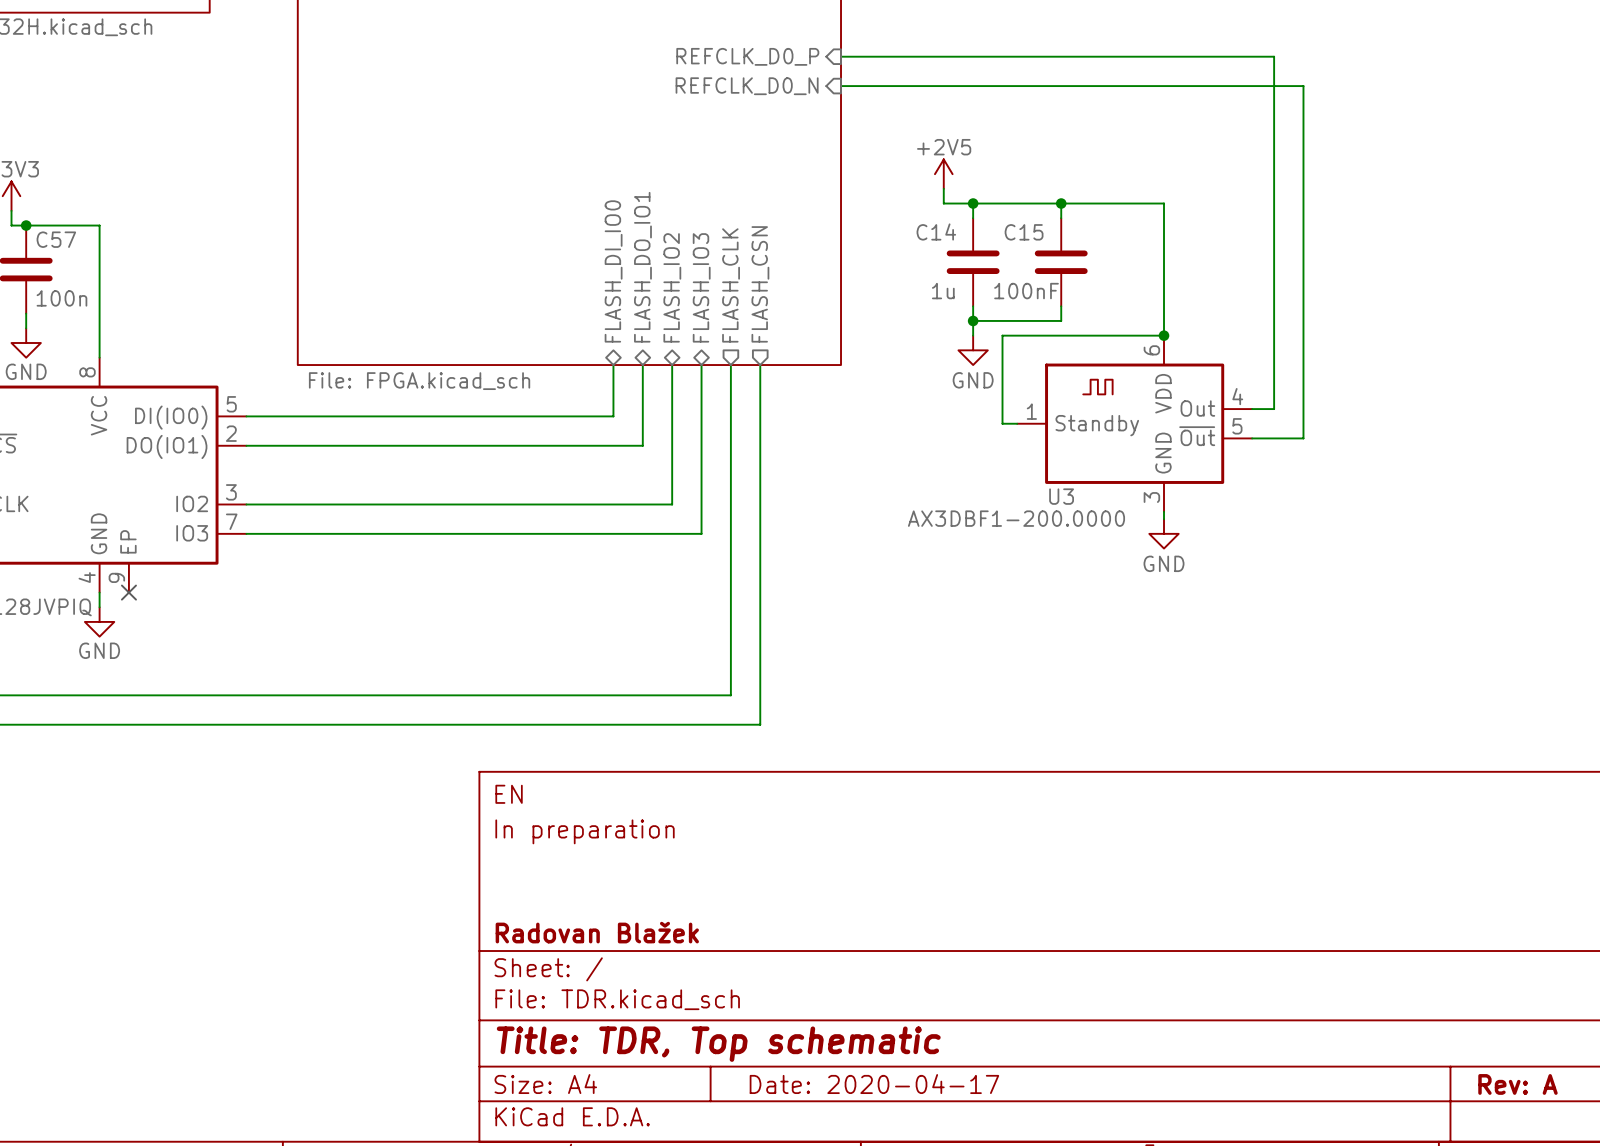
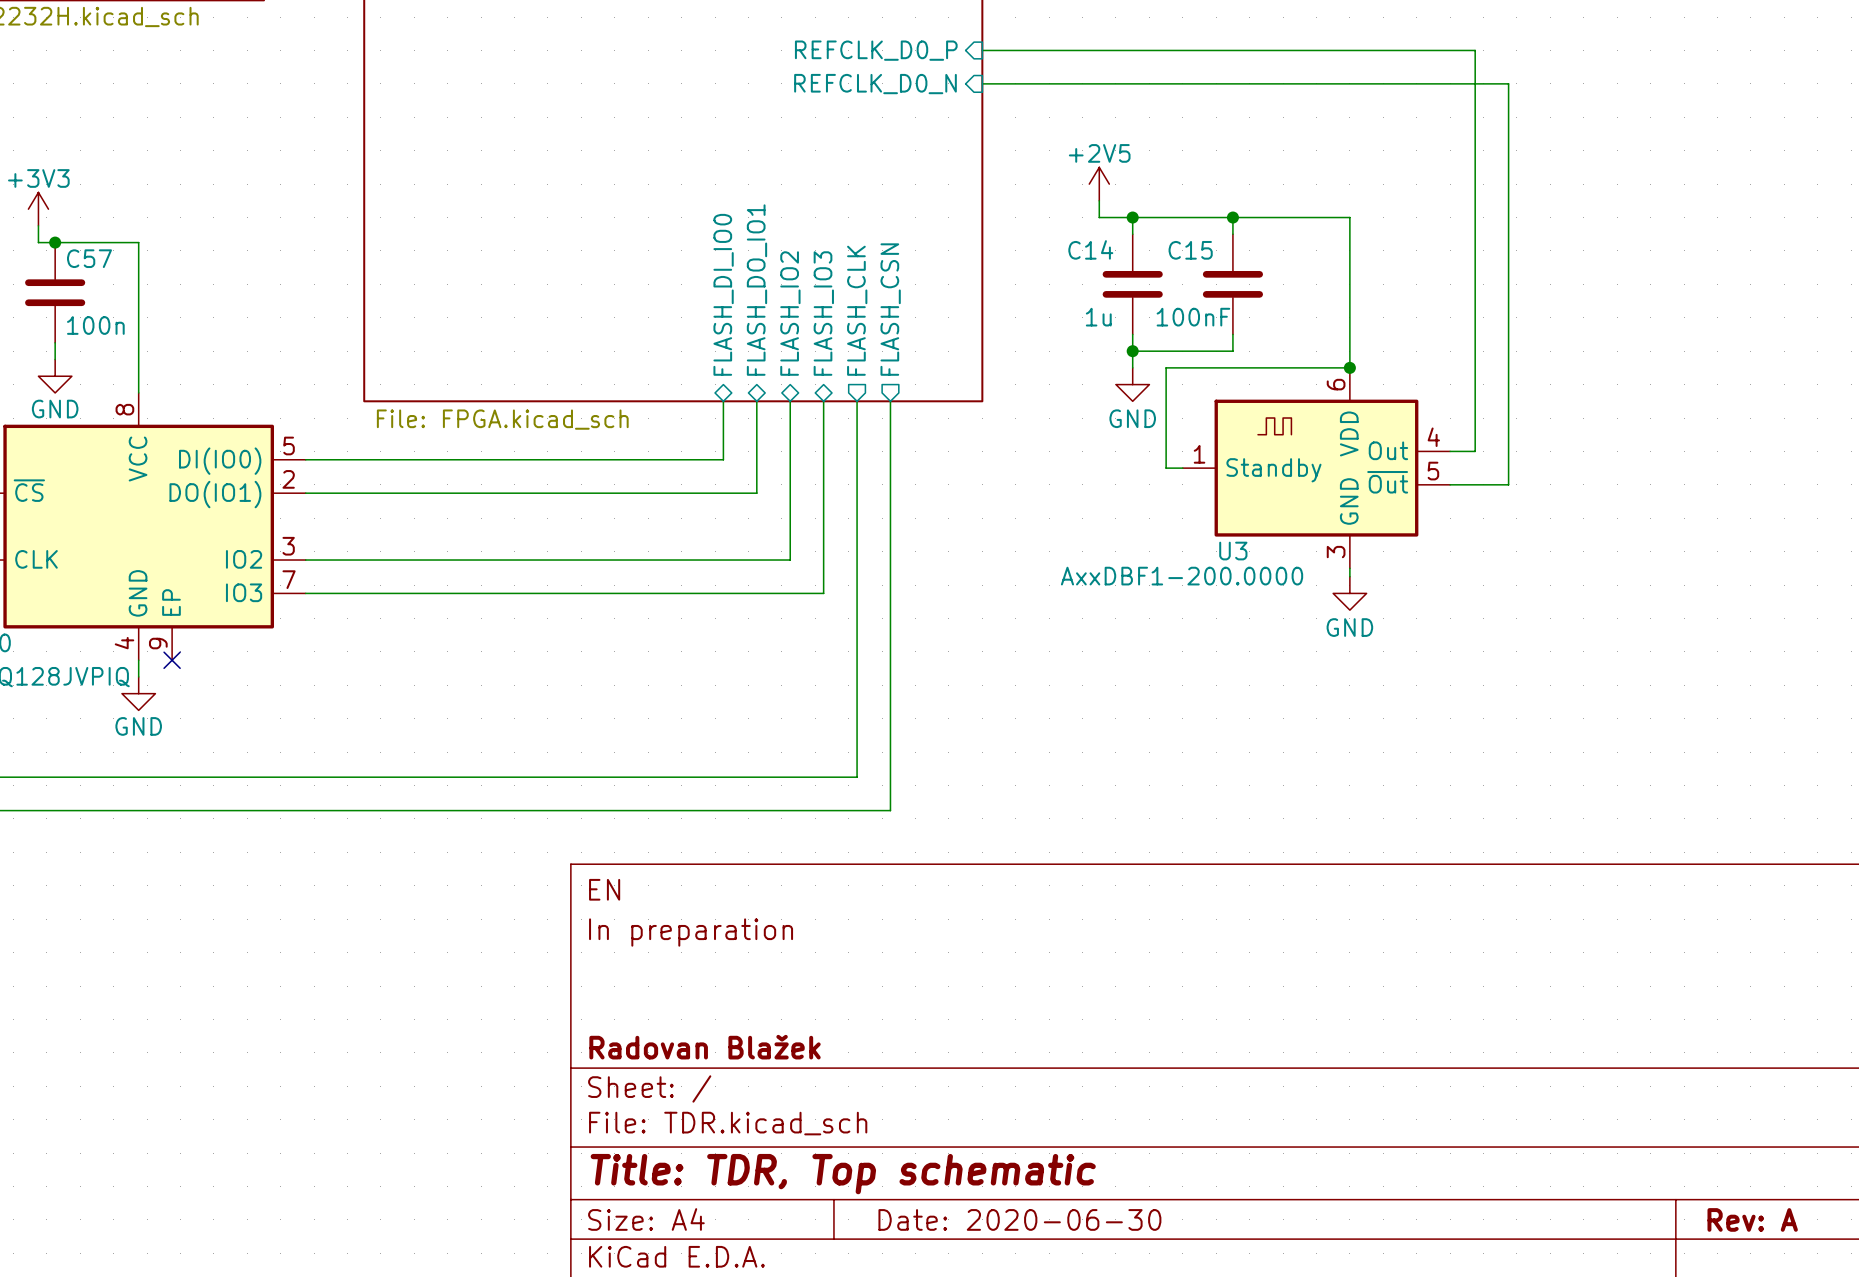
U3 value: AX3DBF1-200.0000 (1016, 518) -> AxxDBF1-200.0000 (1182, 576)
title block: Date: 2020-04-17 (874, 1084) -> Date: 2020-06-30 (1019, 1219)

